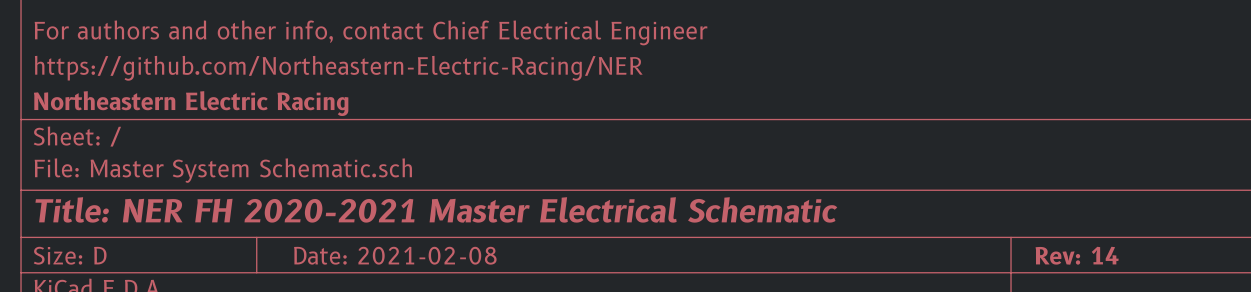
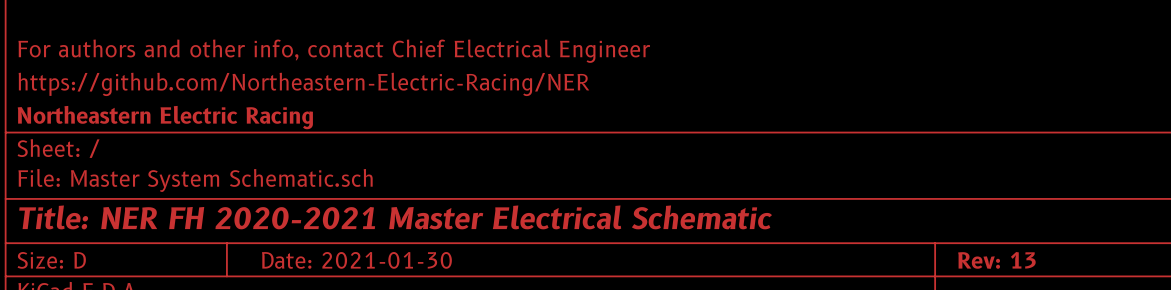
title block: Date: 2021-02-08 (395, 255) -> Date: 2021-01-30 (356, 260)
title block: Rev: 14 (1077, 255) -> Rev: 13 (996, 260)

